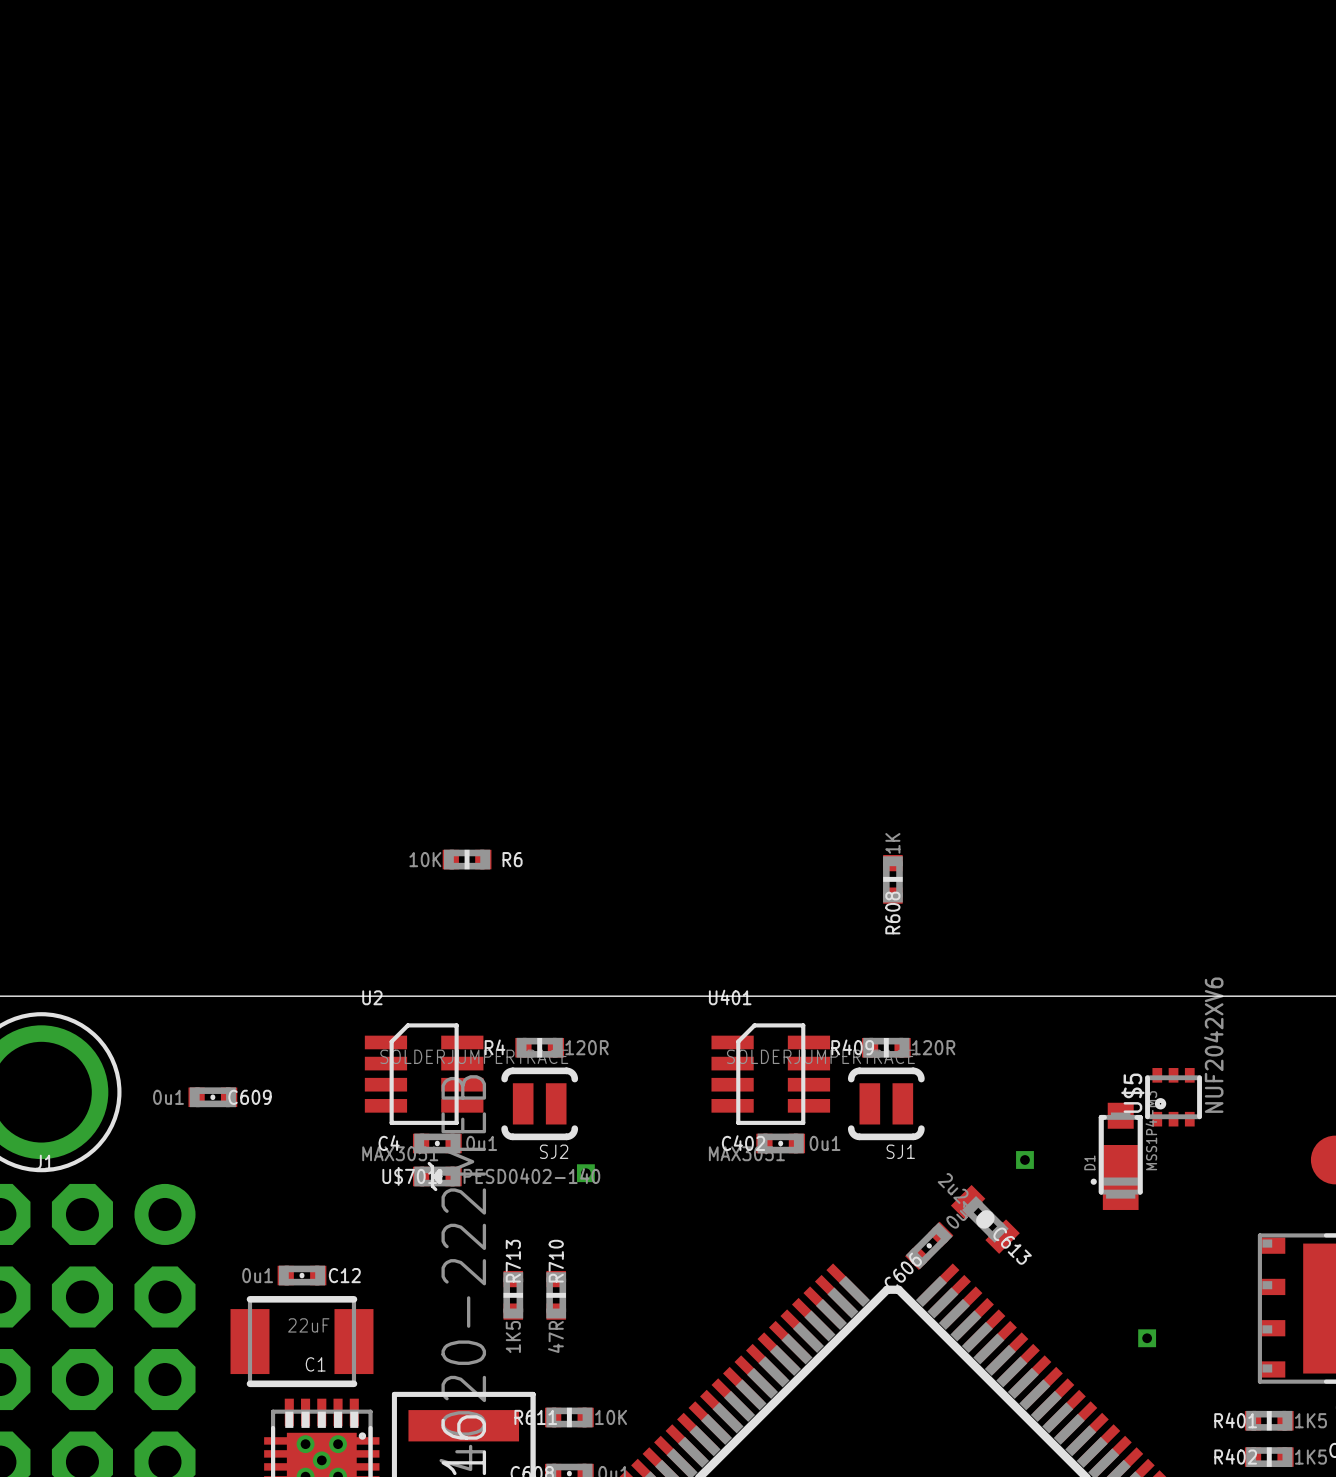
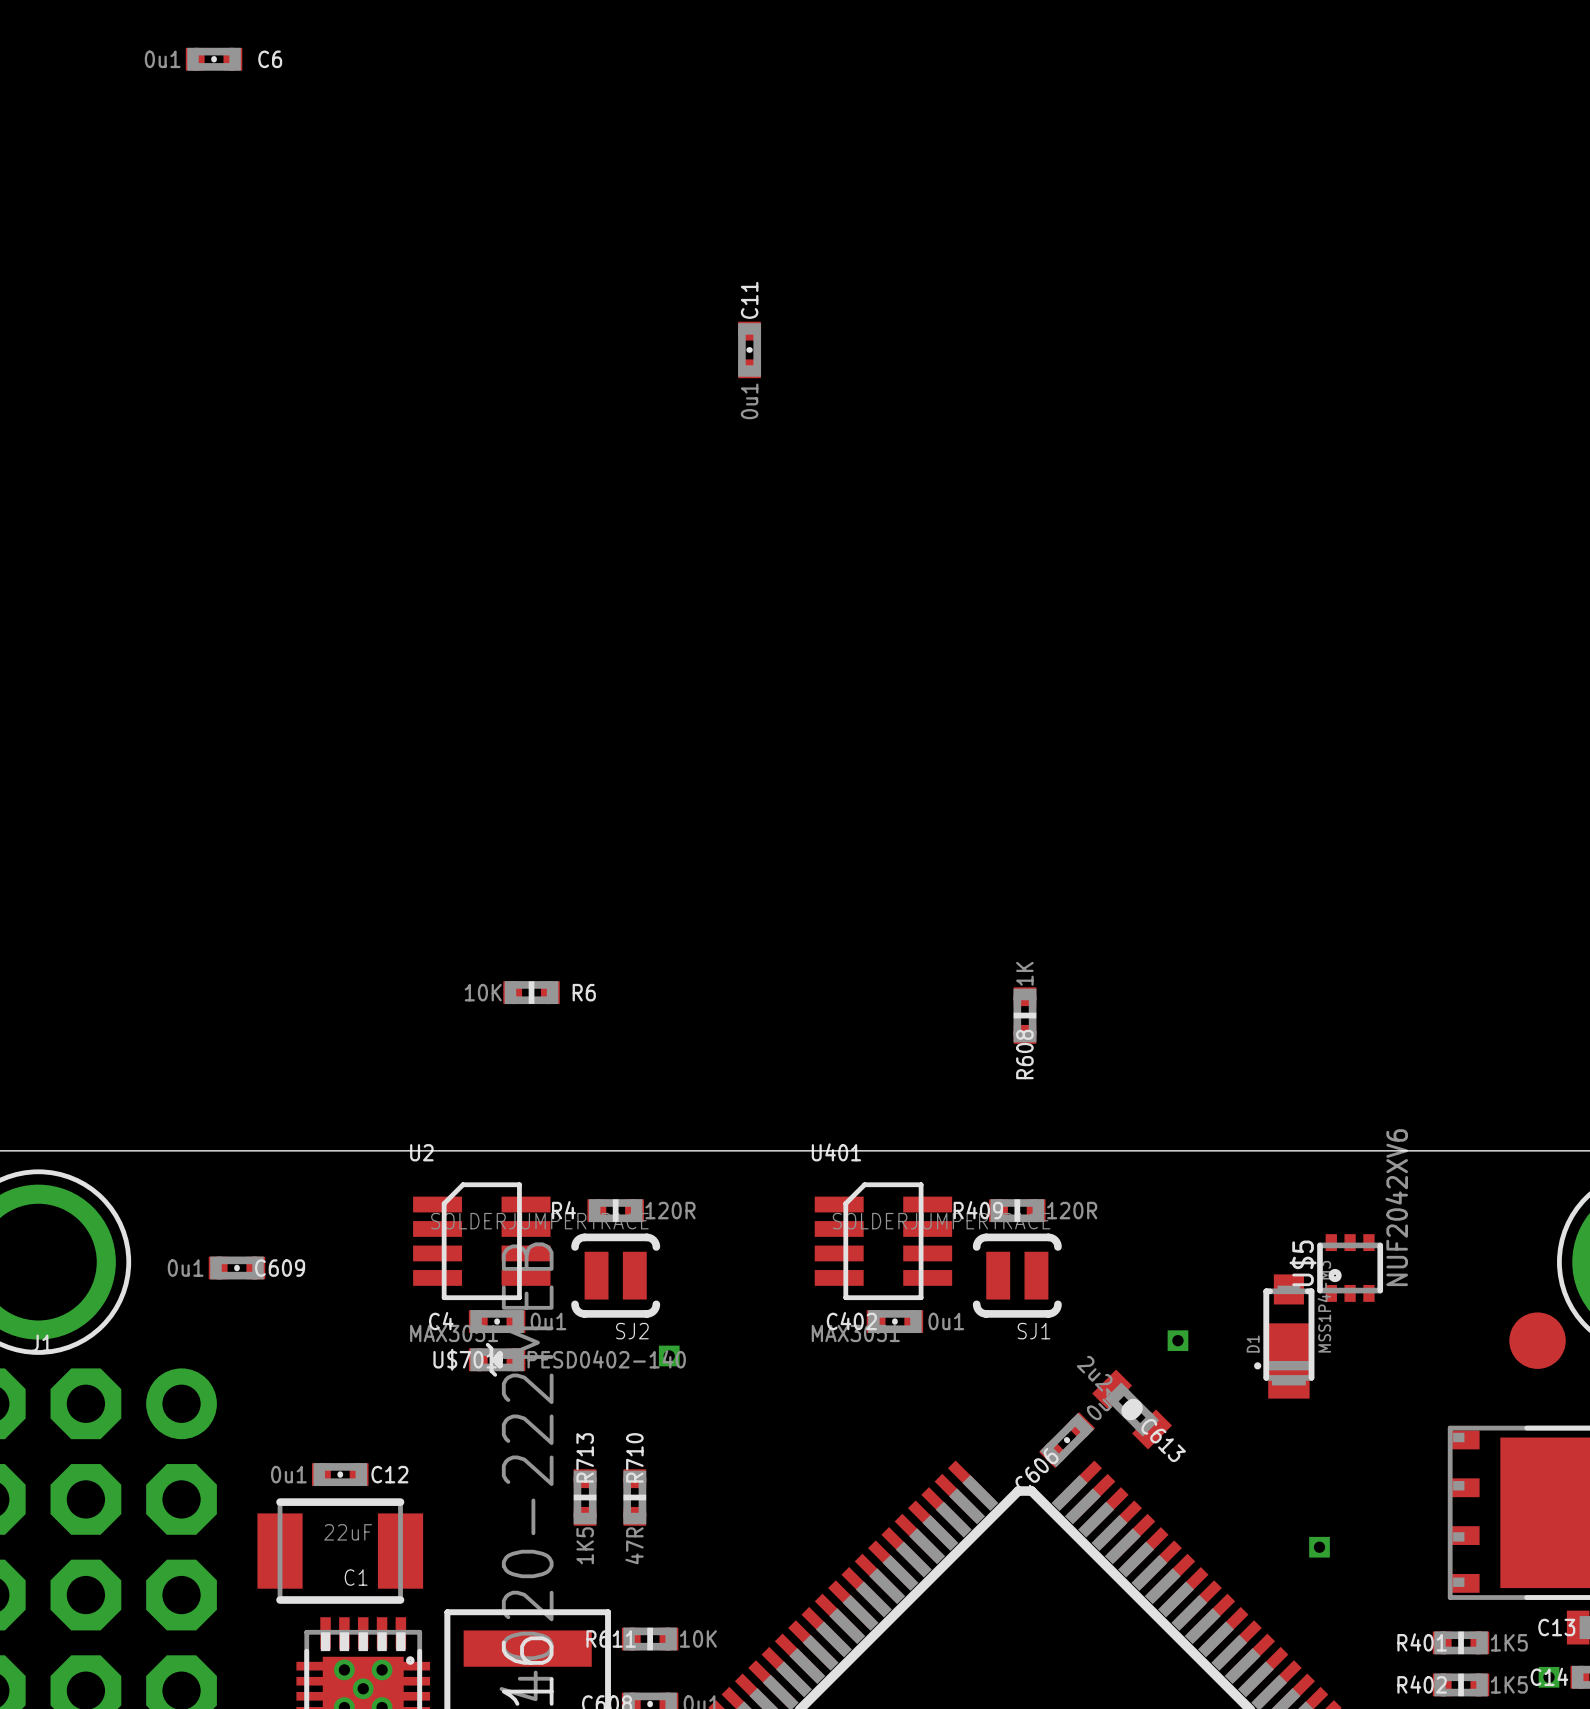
C6: none -> 0u1 (214, 59)
C11: none -> 0u1 (749, 349)

